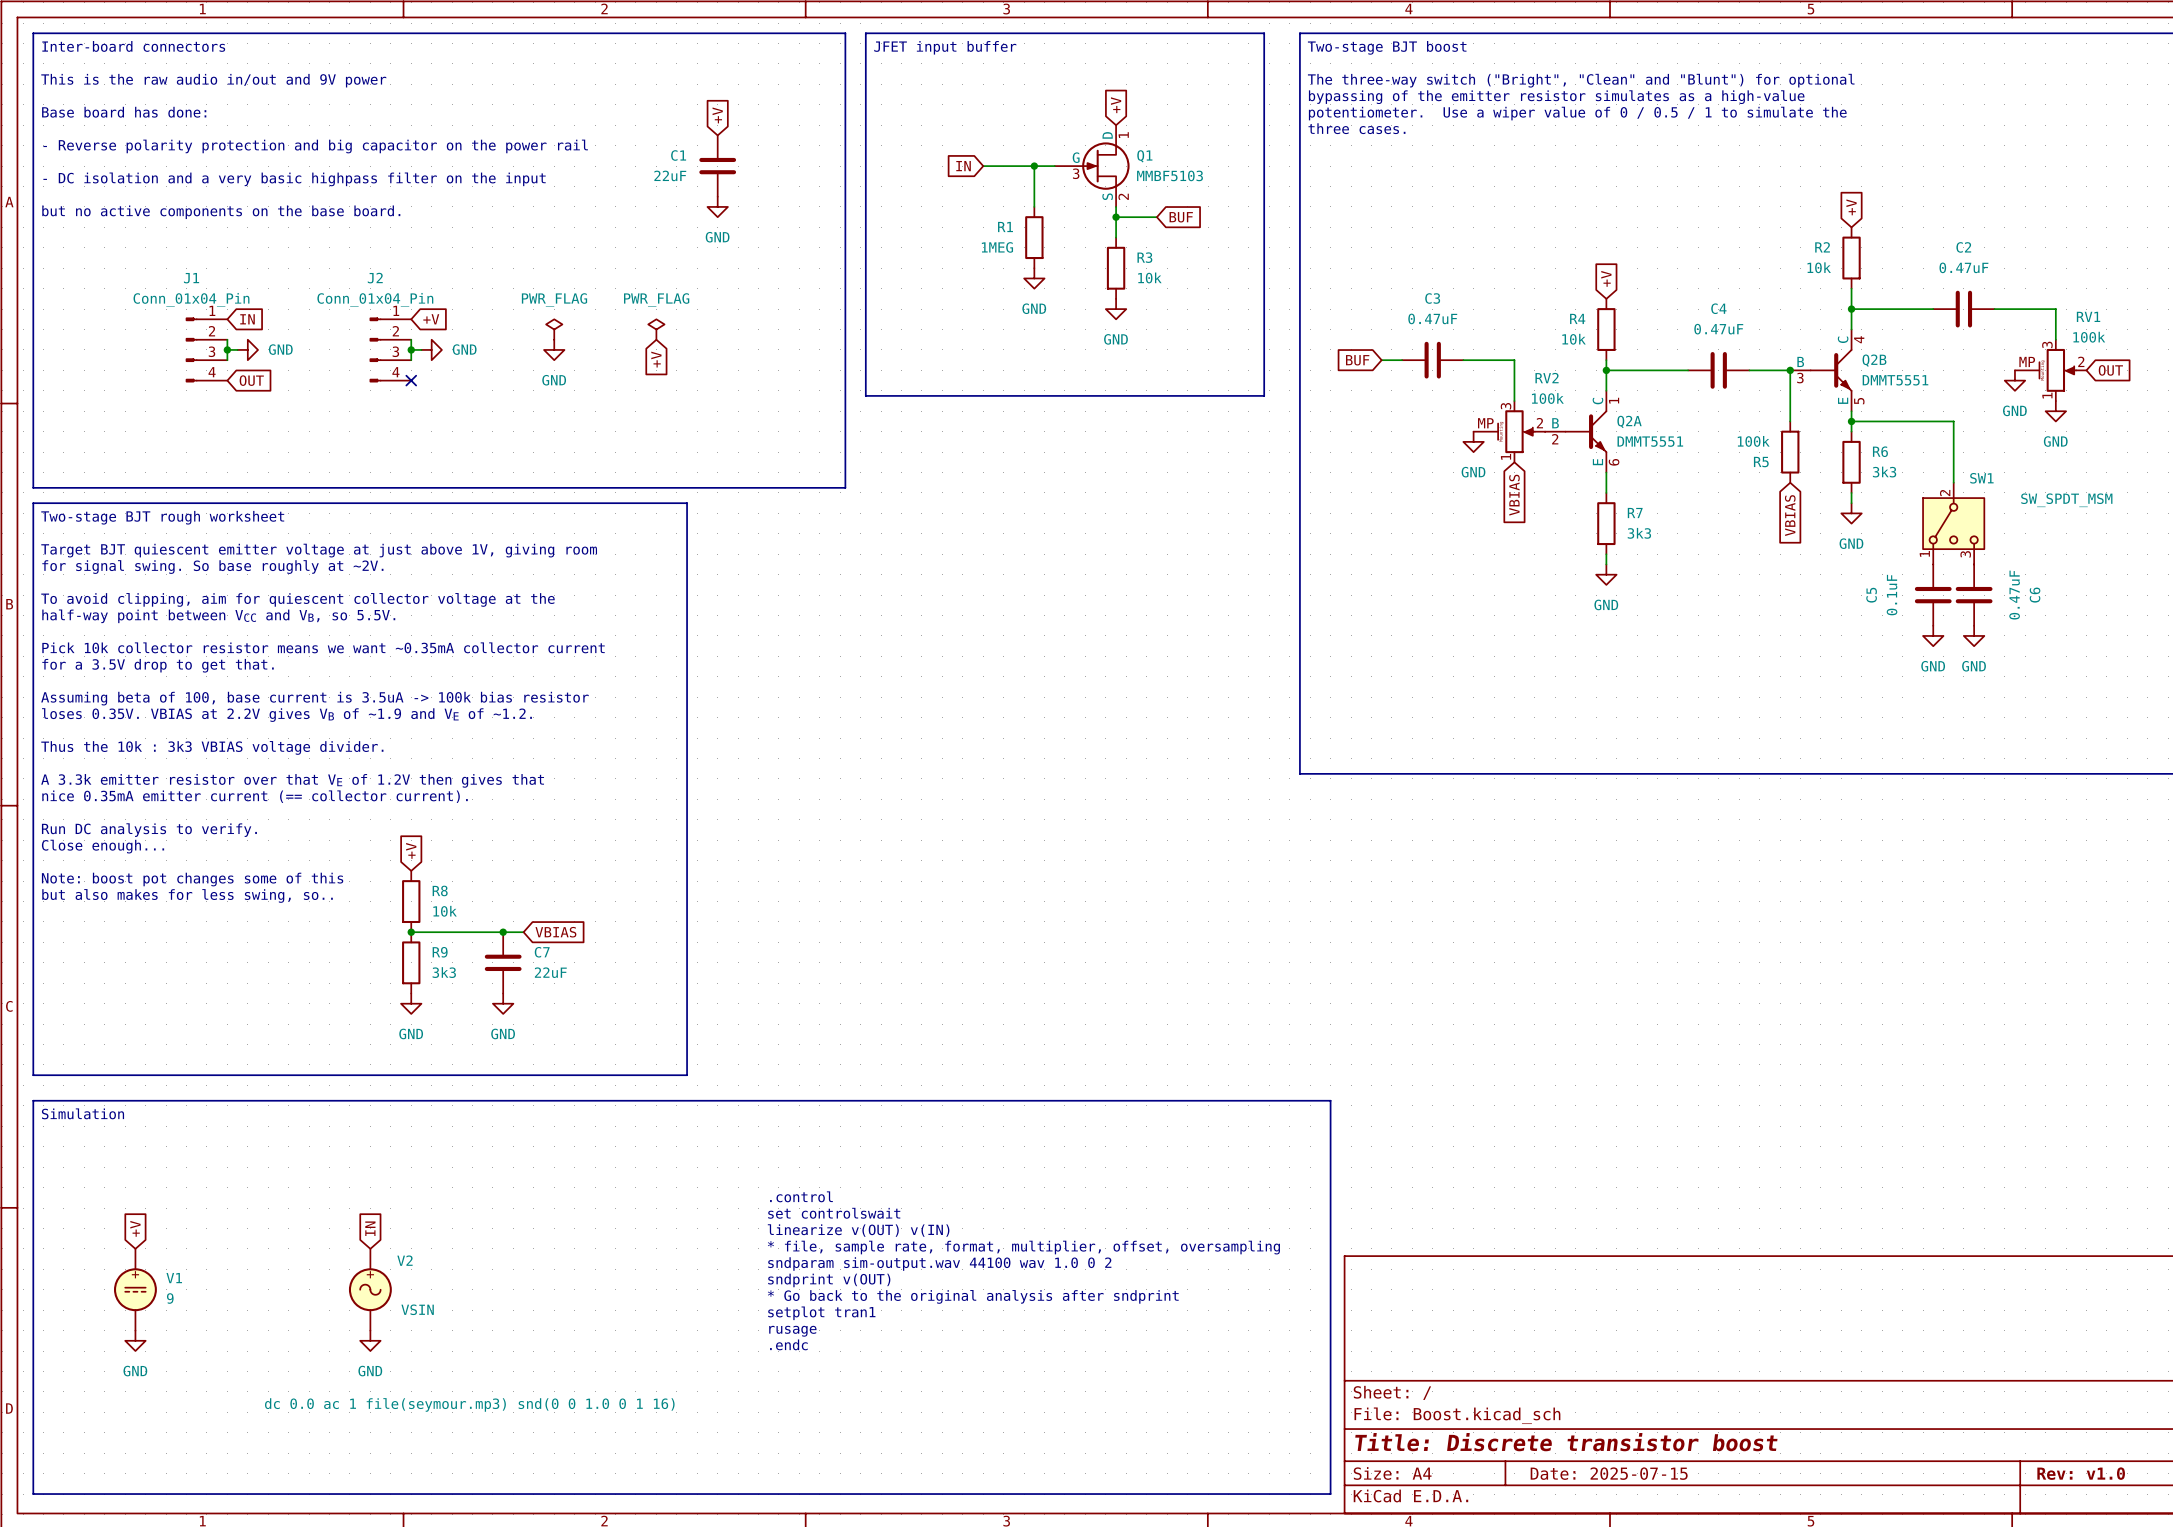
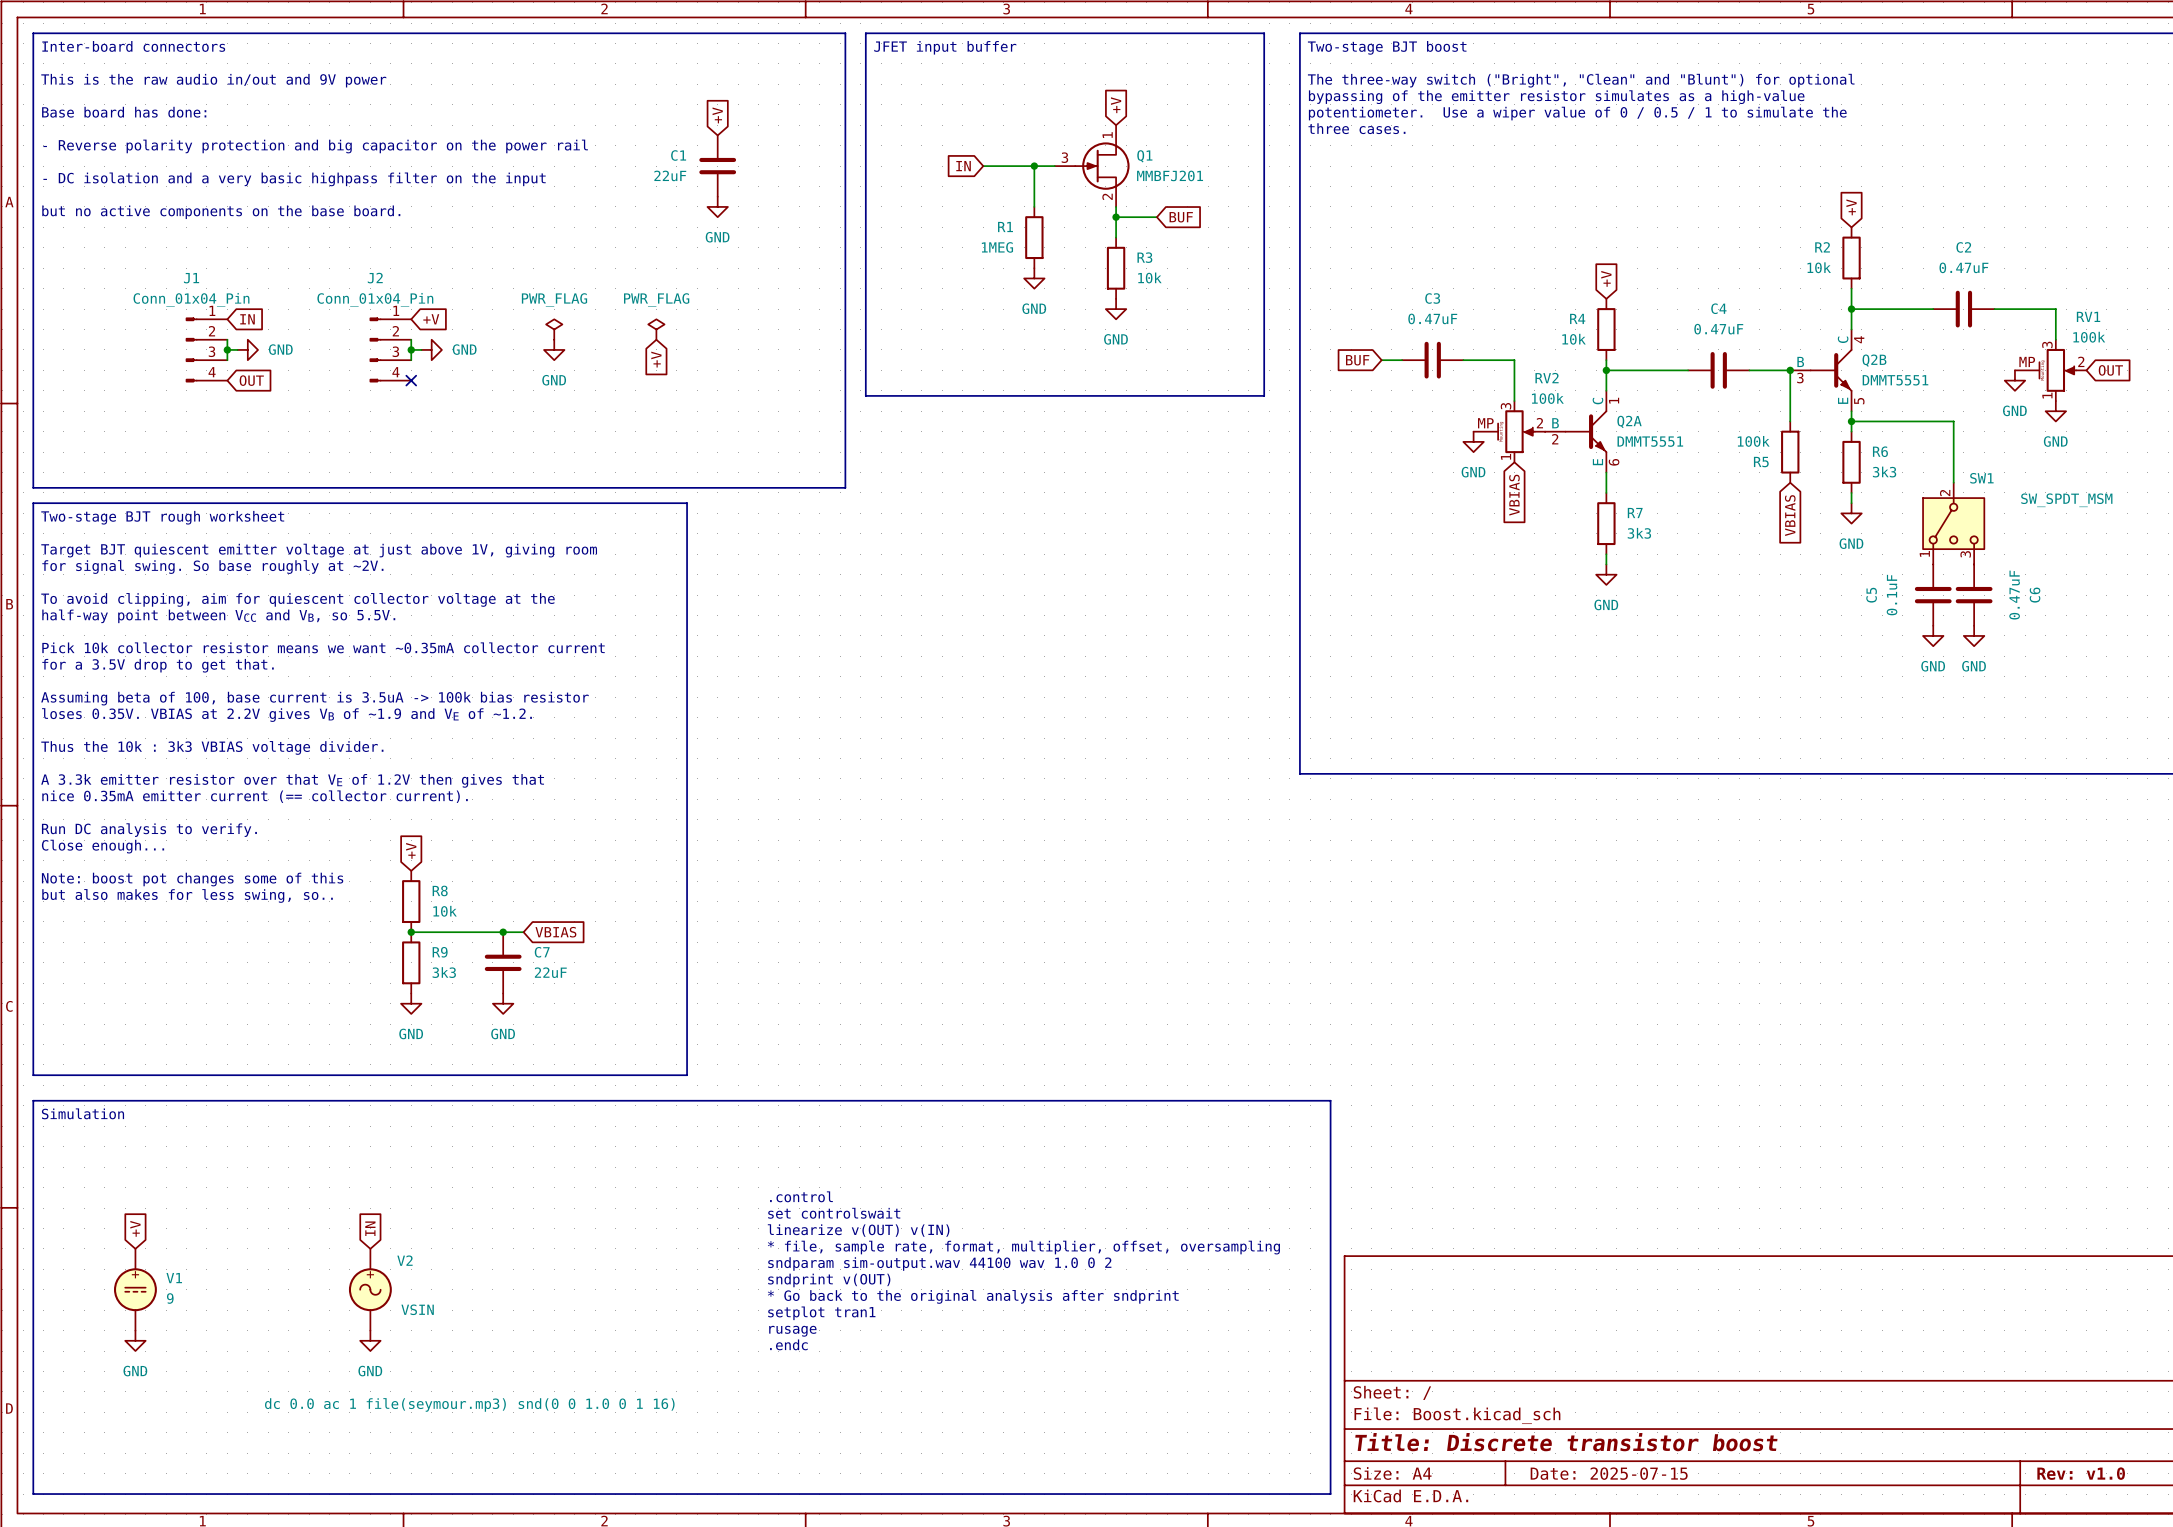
Q1 symbol: [1054, 125, 1130, 207] -> [1054, 125, 1130, 207]
Q1 value: MMBF5103 (1170, 175) -> MMBFJ201 (1170, 175)

